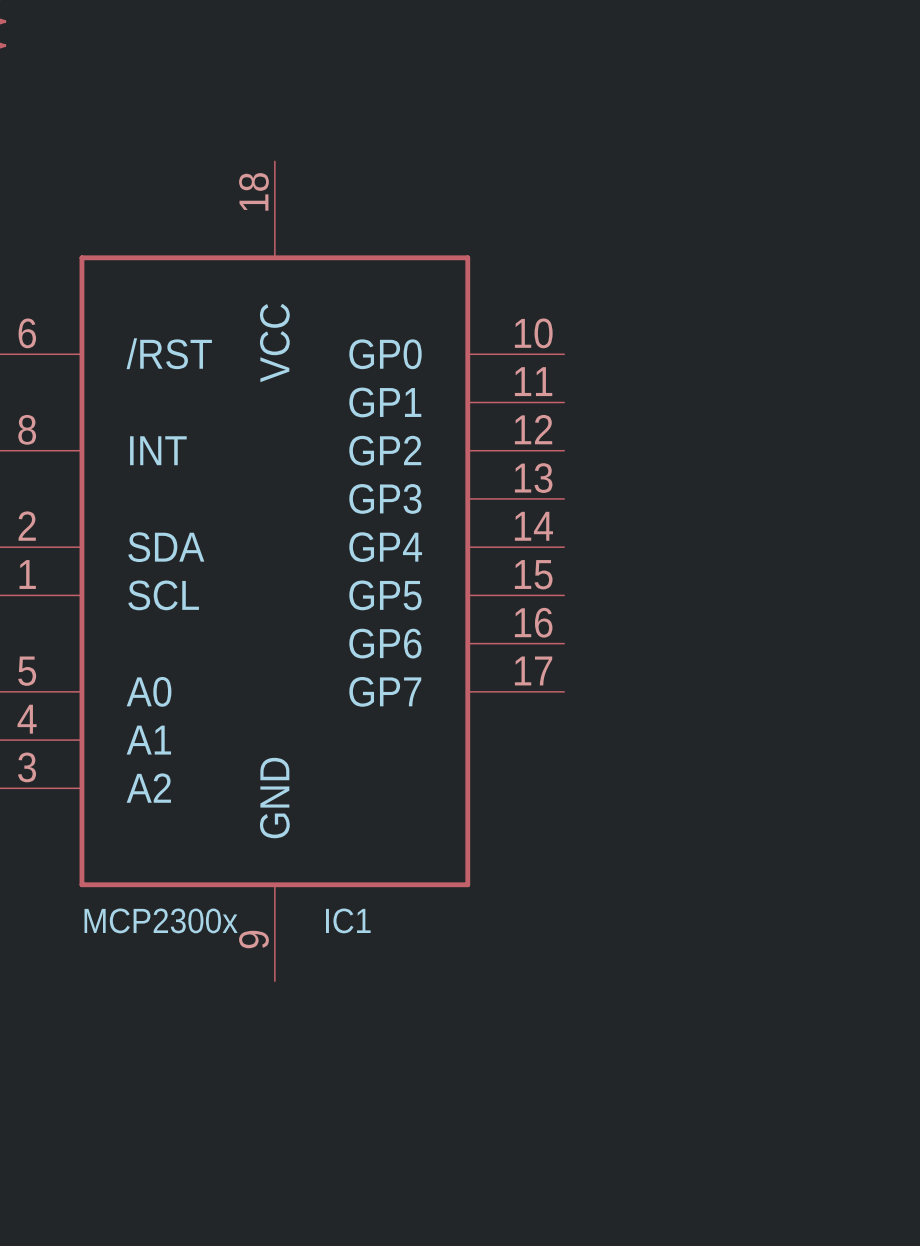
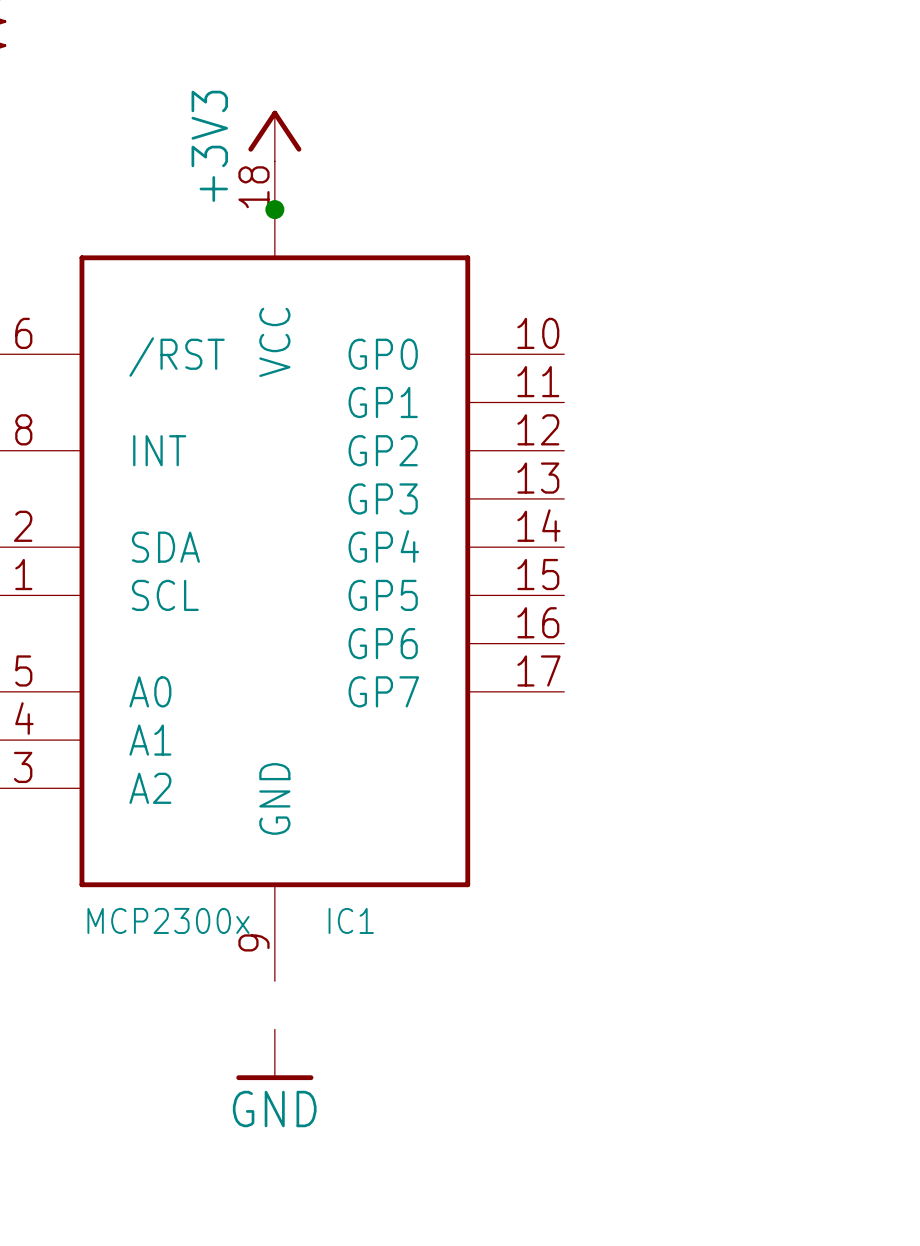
power symbol: none -> +3V3 (274, 136)
junction: none -> (274, 209)
power symbol: none -> GND (274, 1054)

